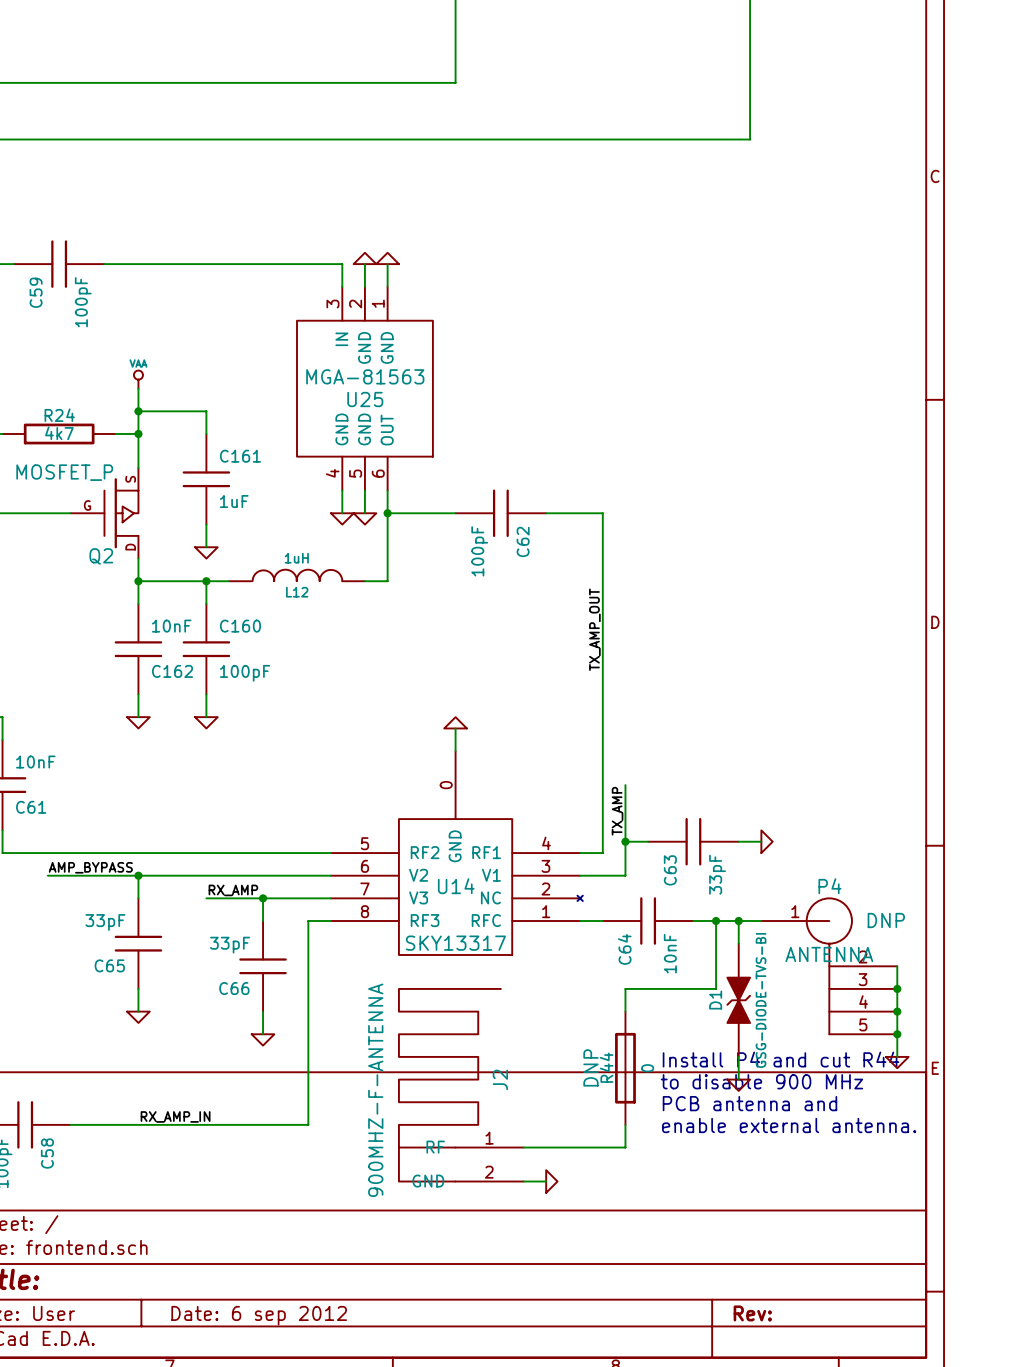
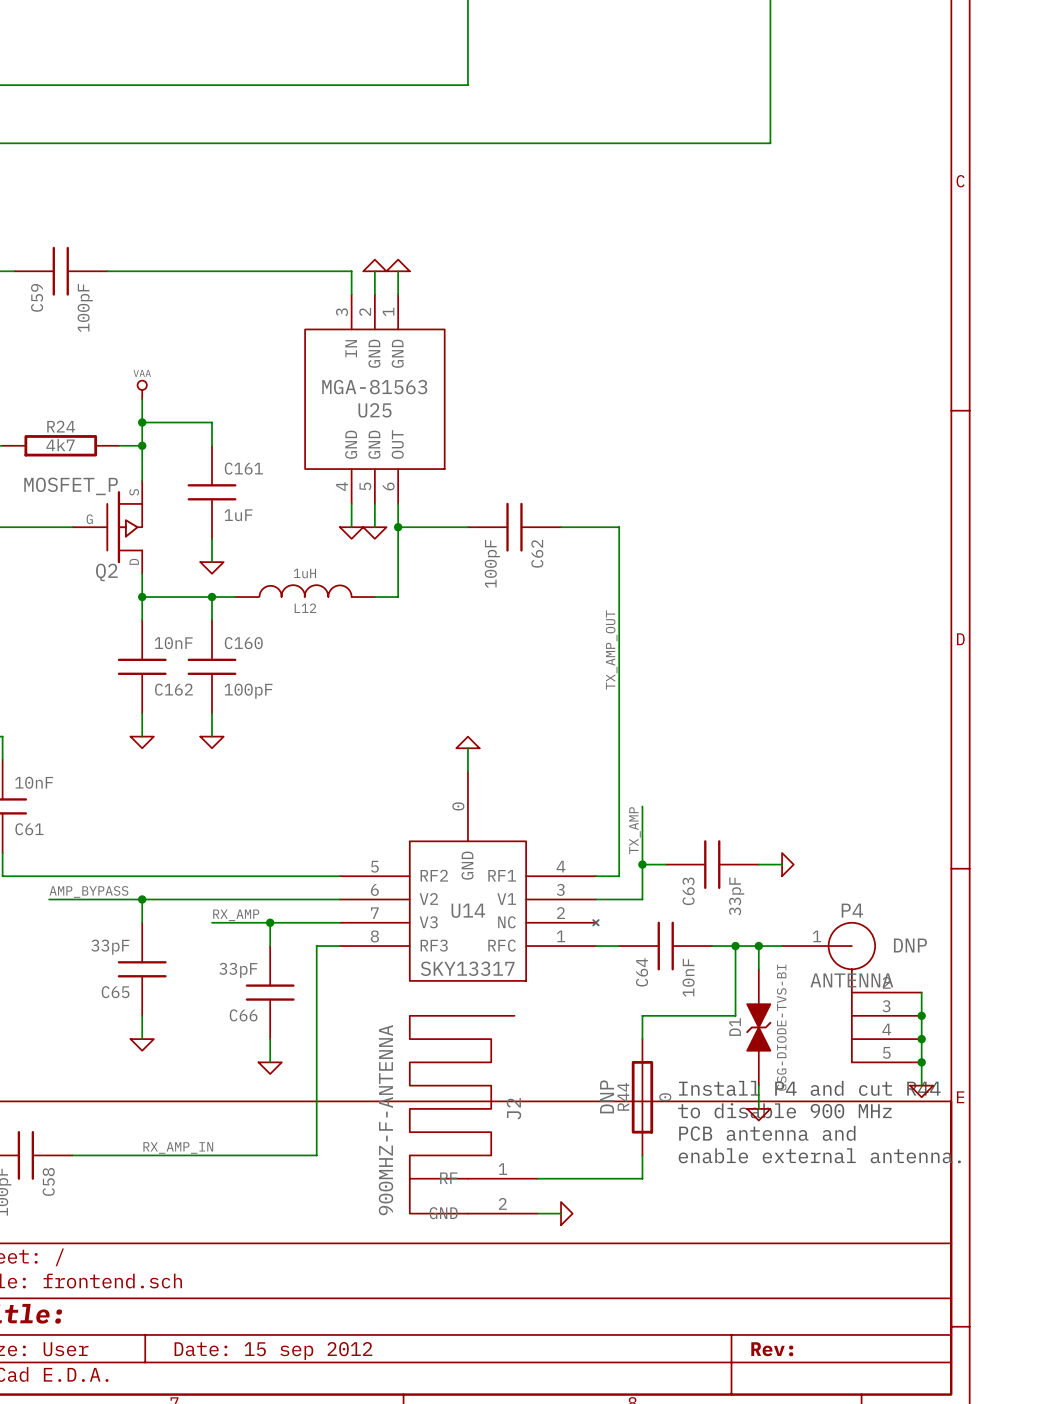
title block: Date: 6 sep 2012 (259, 1315) -> Date: 15 sep 2012 (273, 1350)

